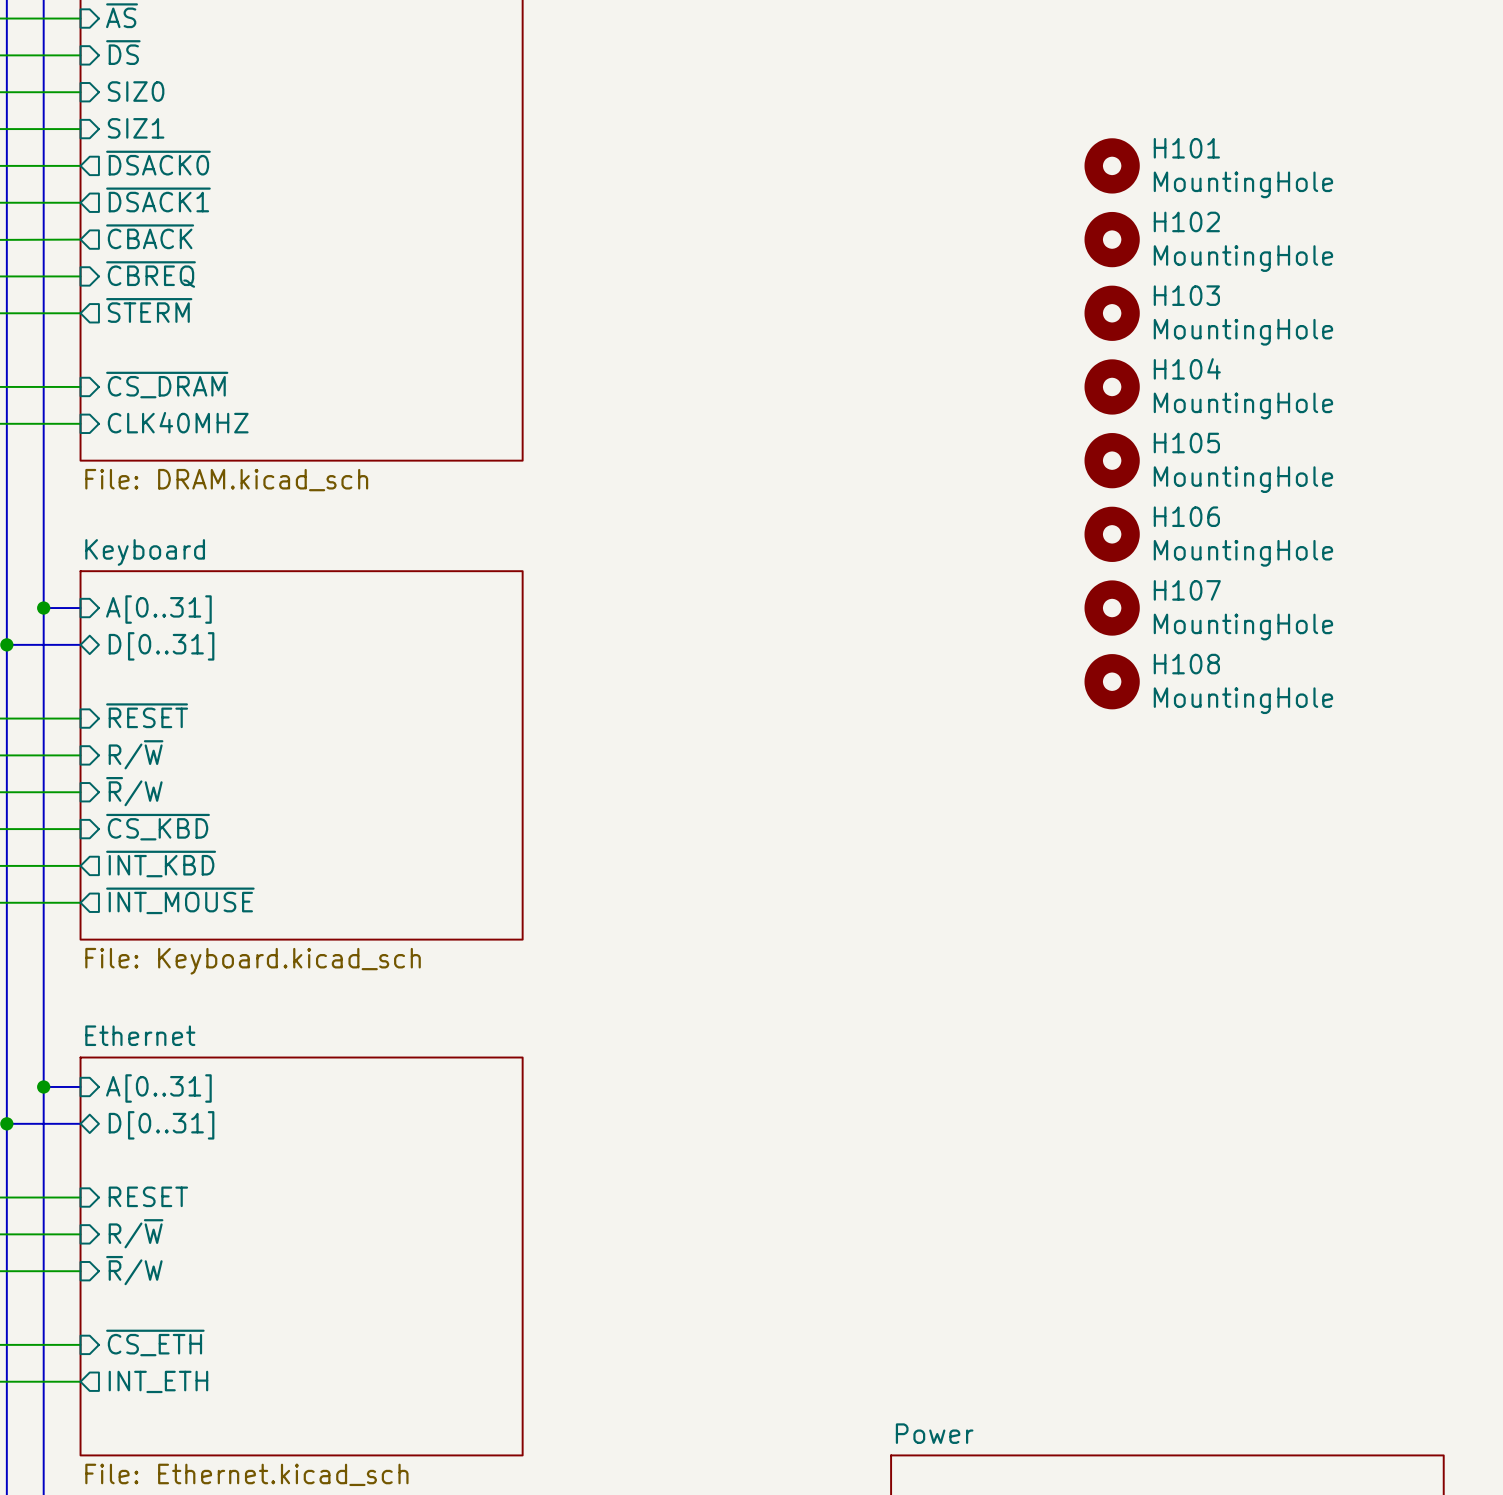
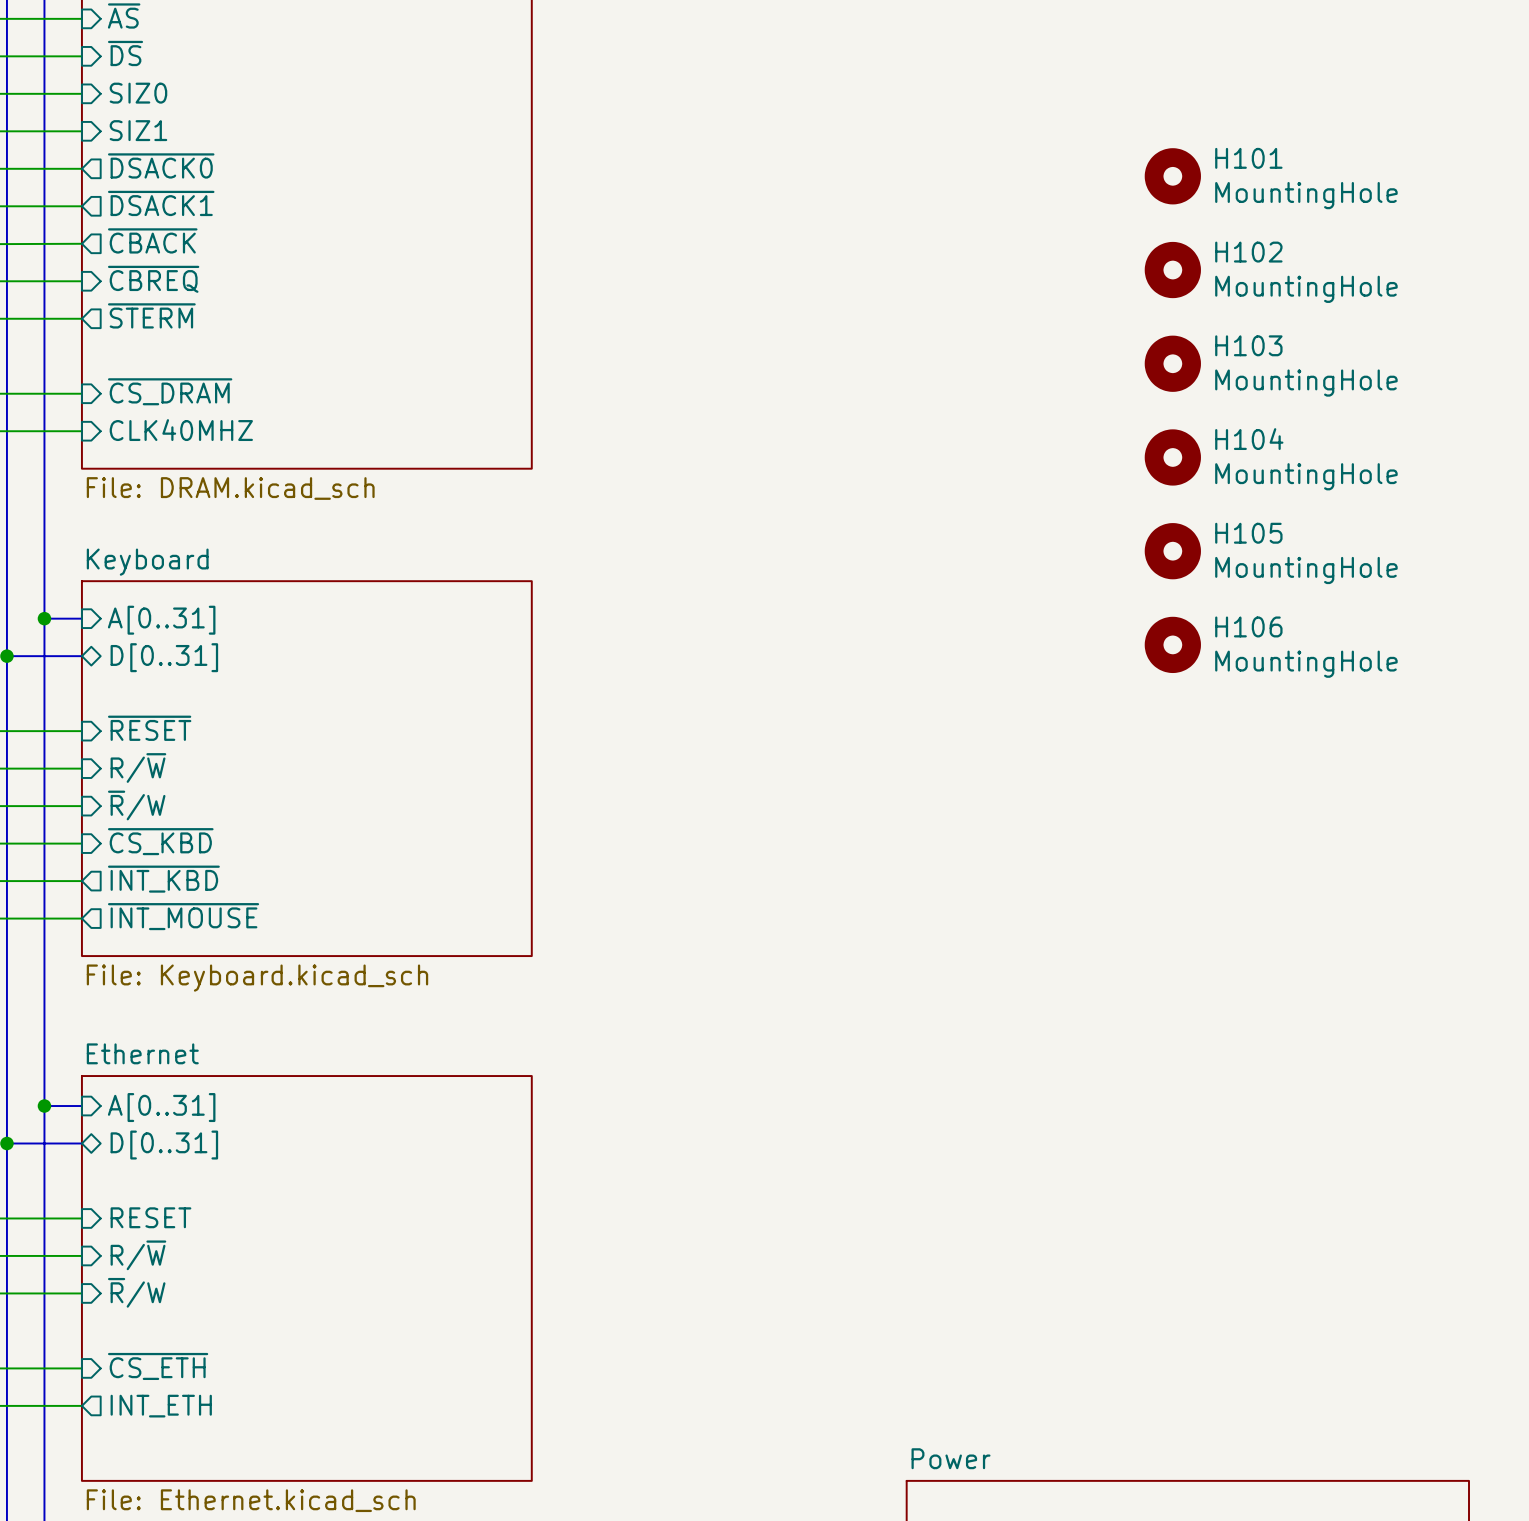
H101 position: (1112, 165) -> (1172, 176)
H102 position: (1112, 239) -> (1172, 270)
H103 position: (1112, 313) -> (1172, 363)
H104 position: (1112, 386) -> (1172, 457)
H105 position: (1112, 460) -> (1172, 551)
H106 position: (1112, 534) -> (1172, 644)
H107: MountingHole (1112, 608) -> none
H108: MountingHole (1112, 681) -> none

